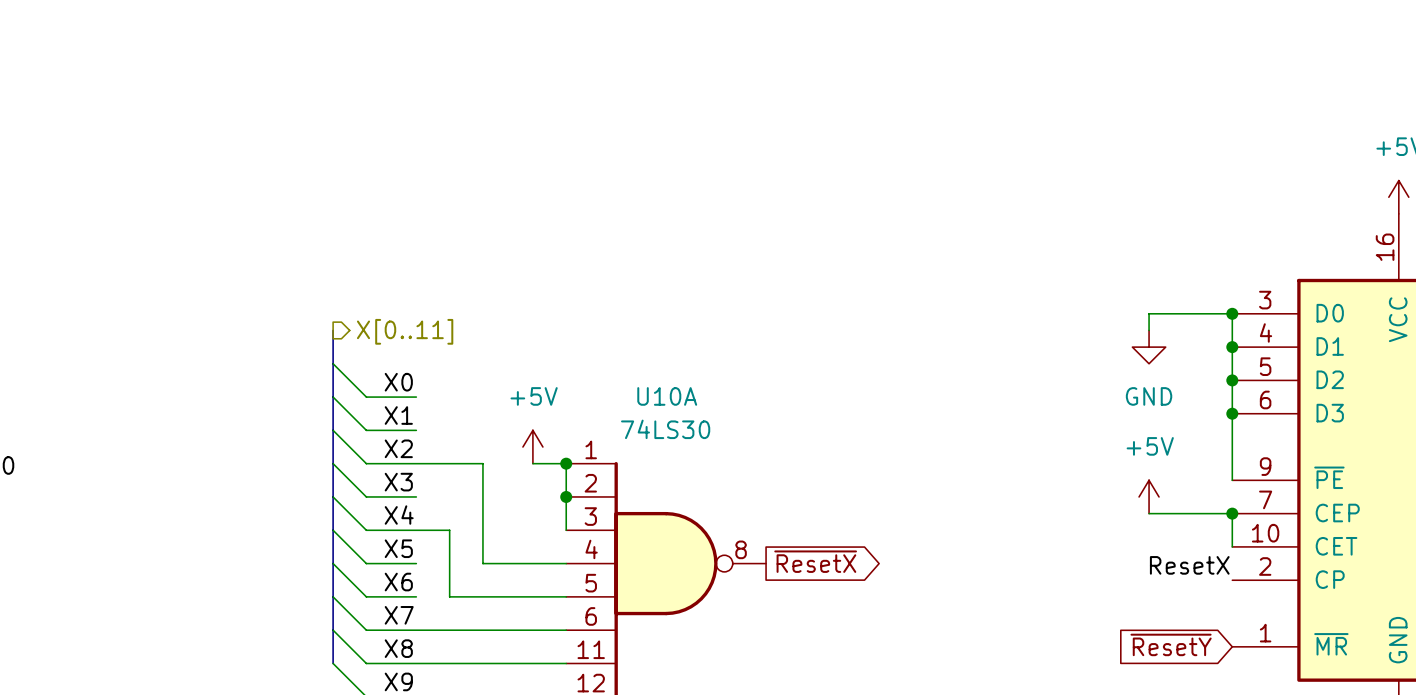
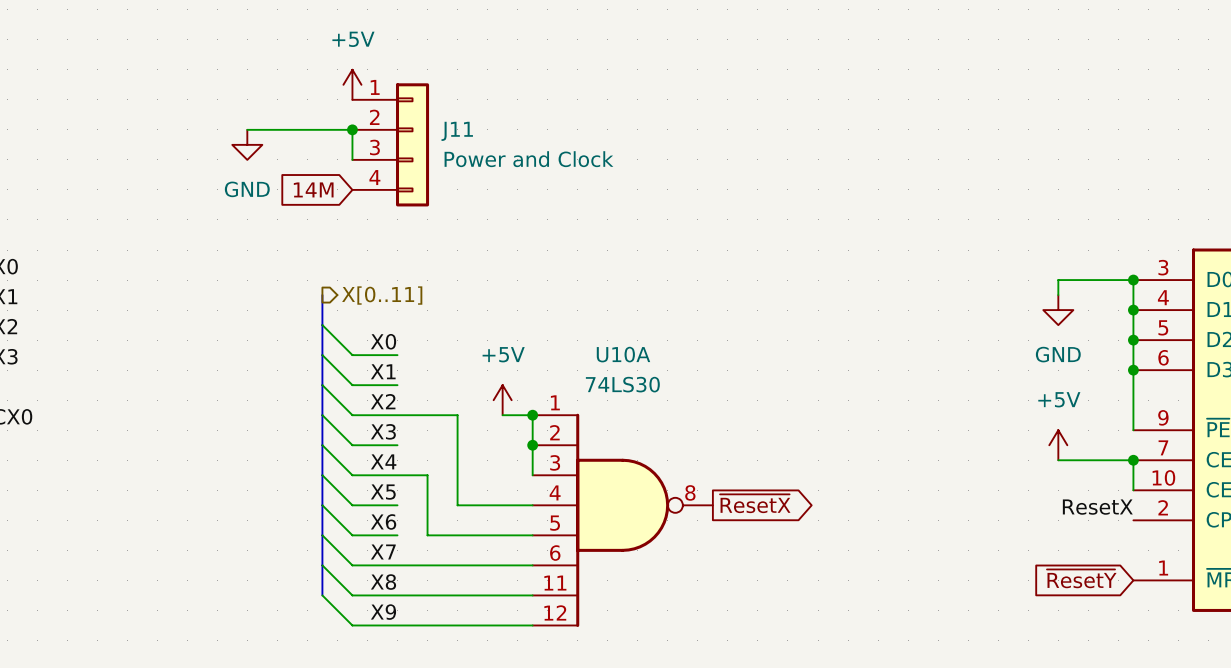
power symbol: none -> +5V (352, 84)
wire: none -> (247, 129) (352, 129) (352, 159)
junction: none -> (352, 129)
power symbol: none -> GND (247, 144)
J11: none -> Power and Clock (390, 144)
global label: none -> 14M (313, 189)

